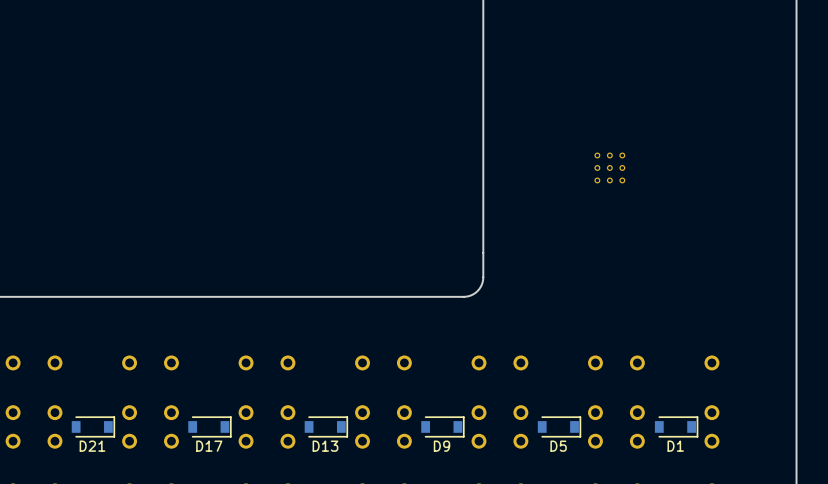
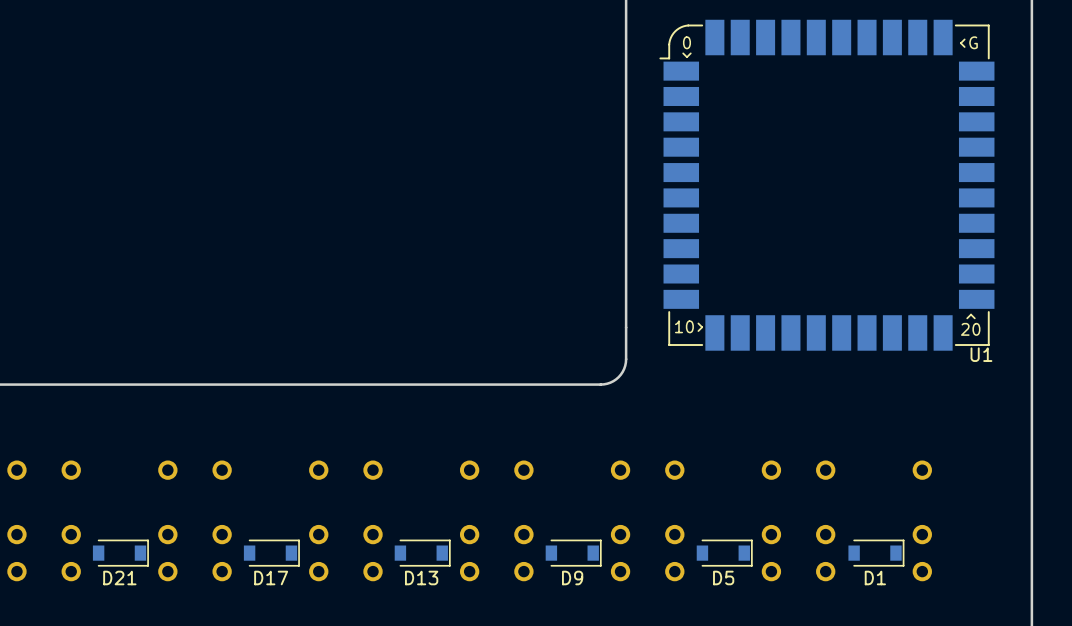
U1: none -> (826, 185)
part: (609, 167) -> none

